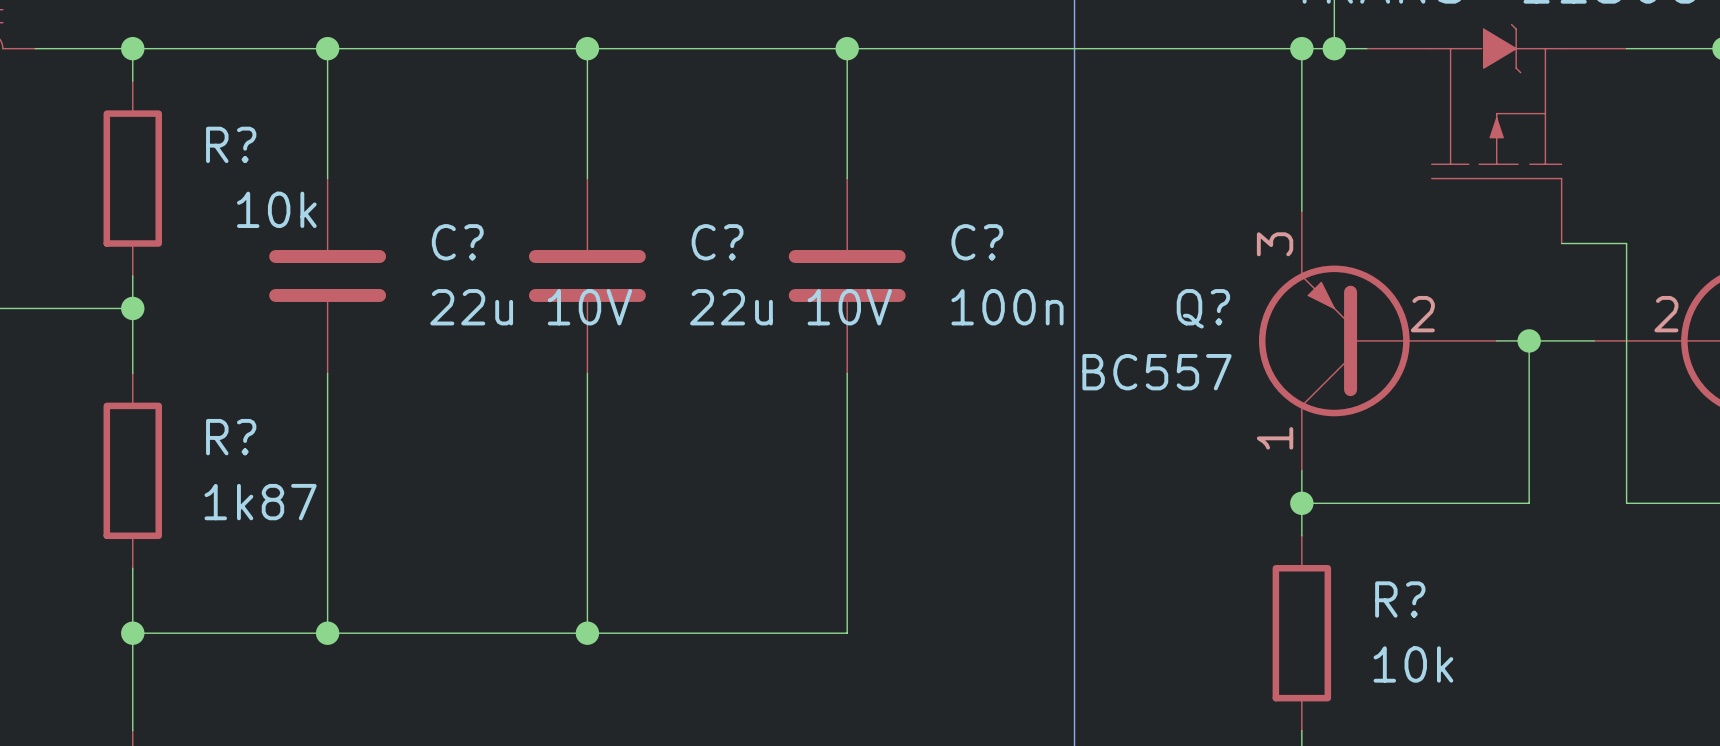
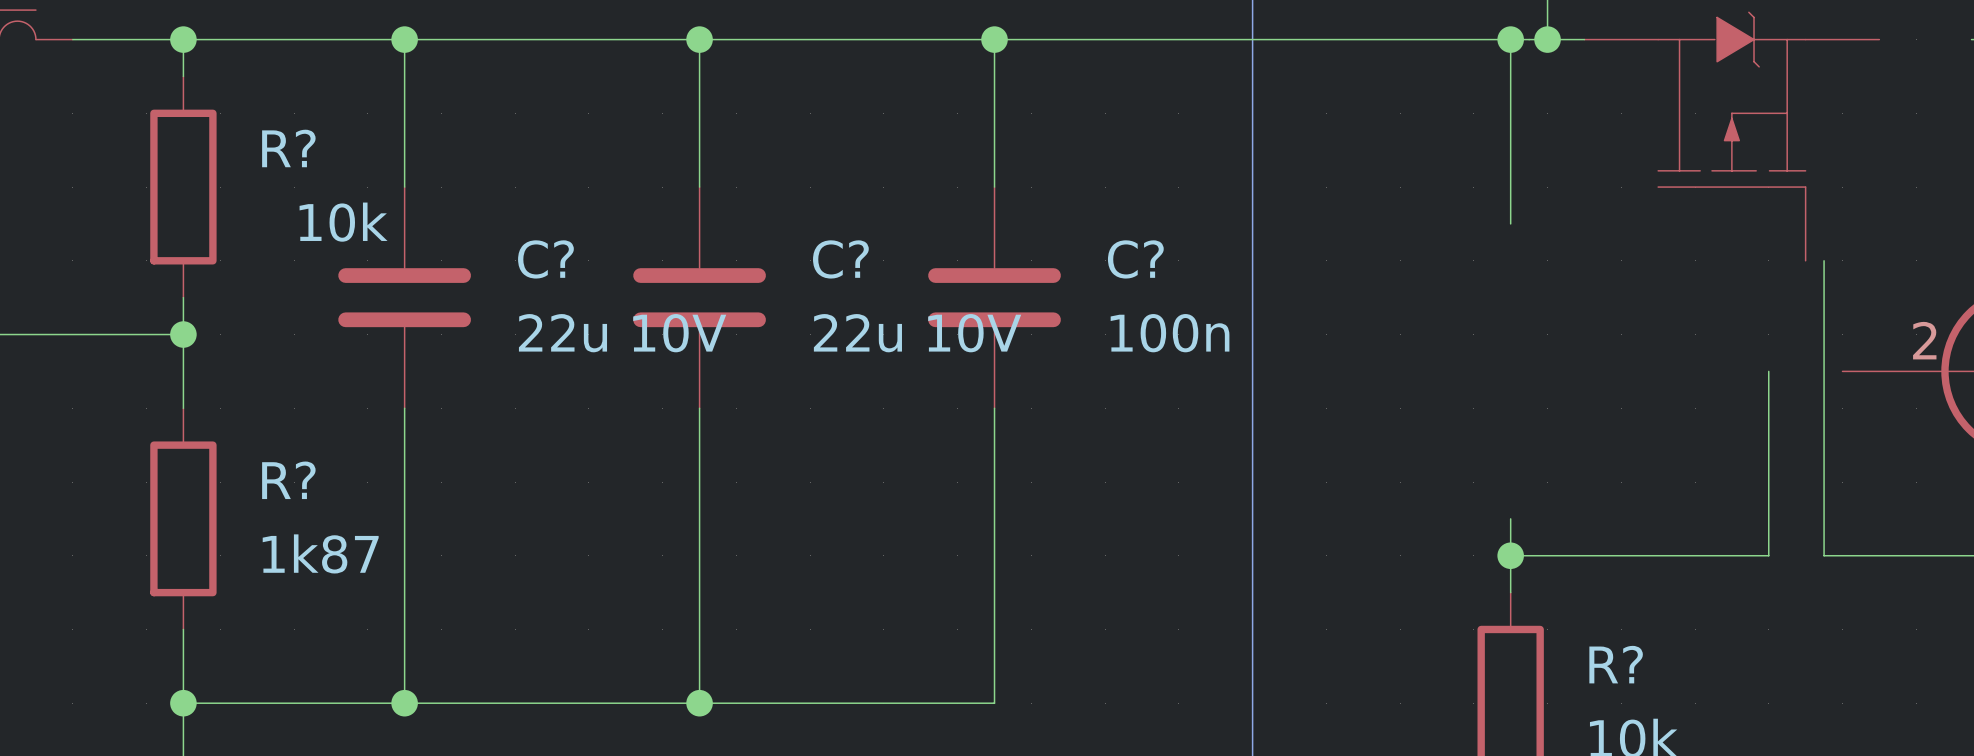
wire: (1626, 48) (1707, 48) -> none
wire: (1561, 243) (1626, 243) (1626, 503) -> (1824, 260) (1824, 555) (1879, 555)
Q?: BC557 (1377, 340) -> none
wire: (1496, 340) (1594, 340) -> none
junction: (1529, 340) -> none

